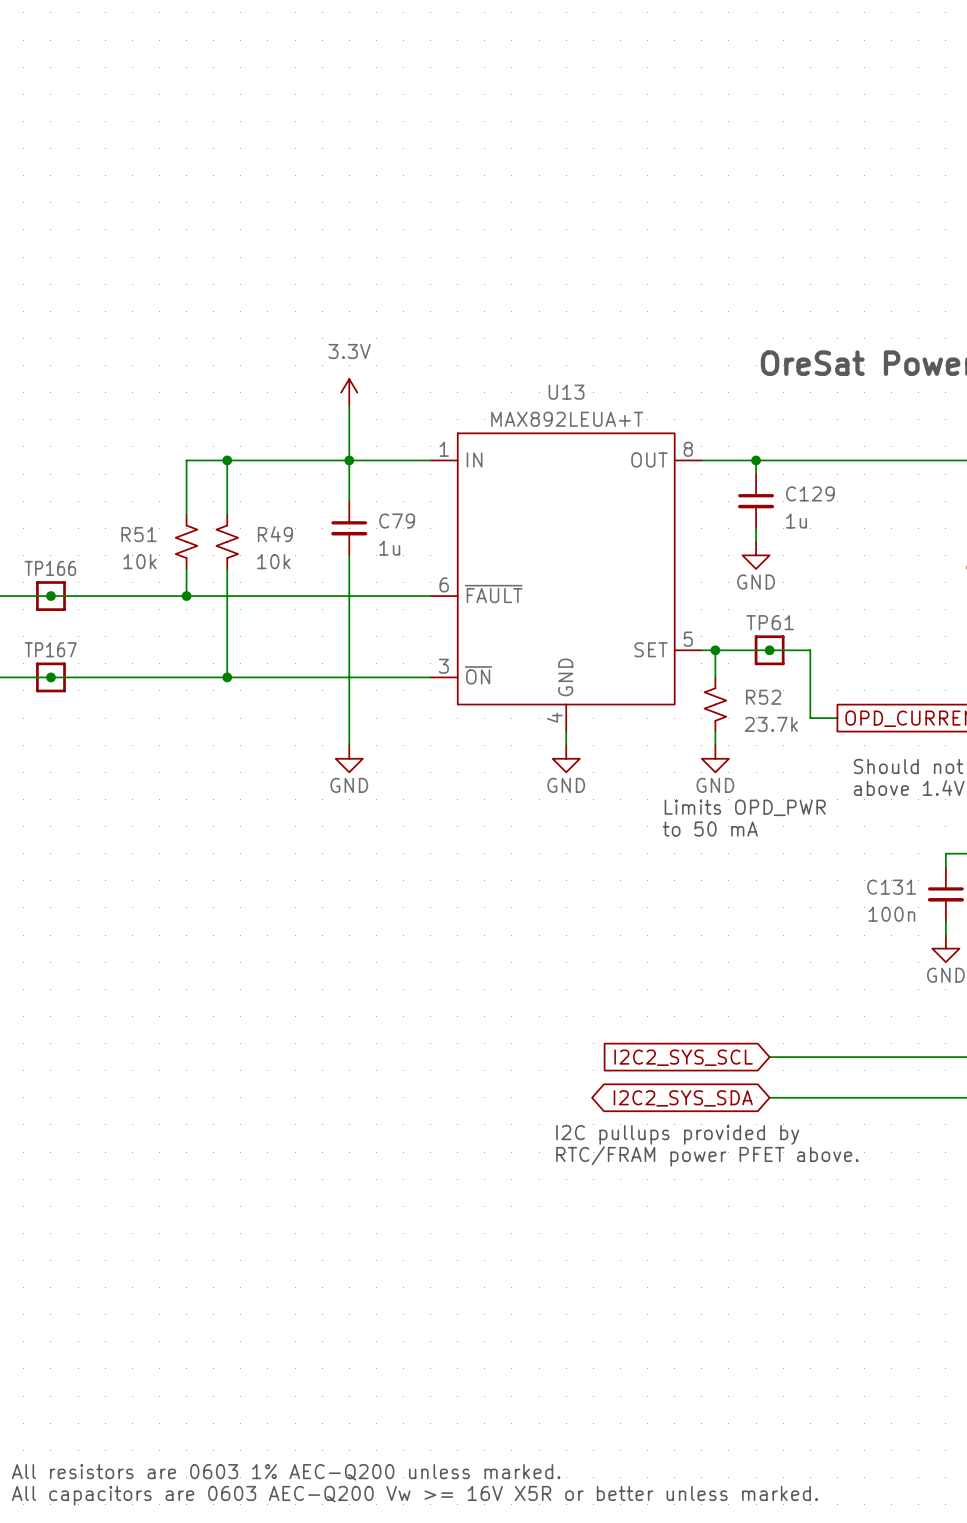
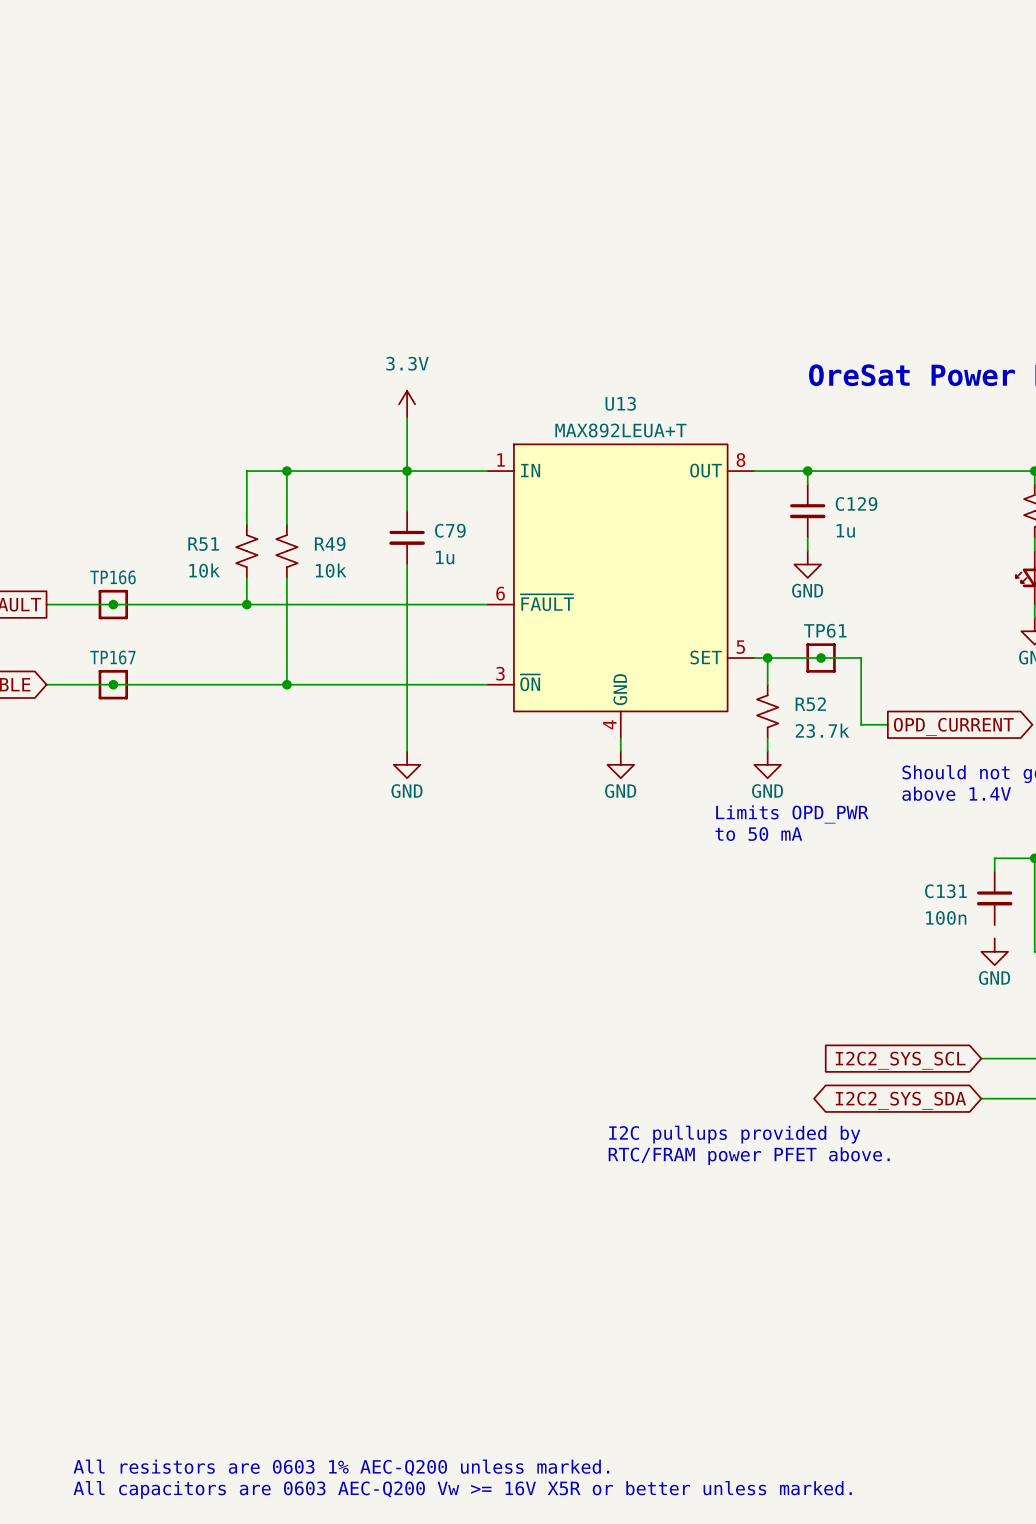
wire: (945, 921) (945, 935) -> none
global label position: I2C2_SYS_SCL (683, 1057) -> I2C2_SYS_SCL (900, 1060)
wire: (769, 1057) (932, 1057) -> none
wire: (769, 1097) (932, 1097) -> none
global label position: I2C2_SYS_SDA (683, 1098) -> I2C2_SYS_SDA (900, 1100)

